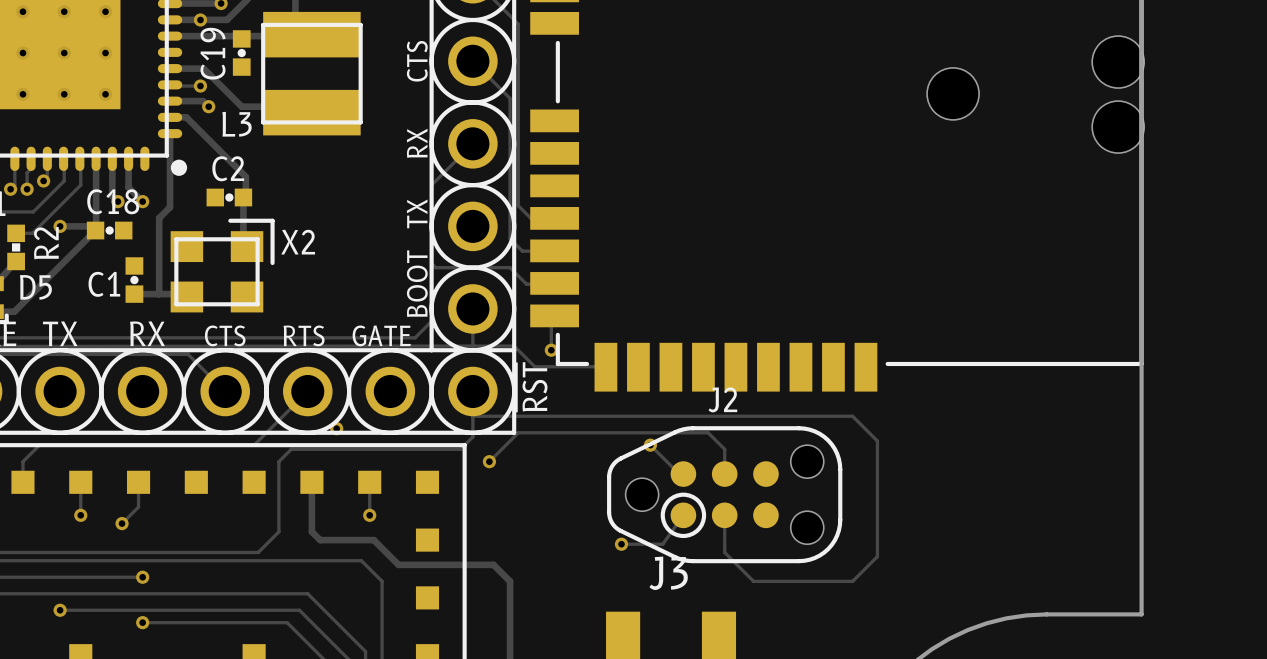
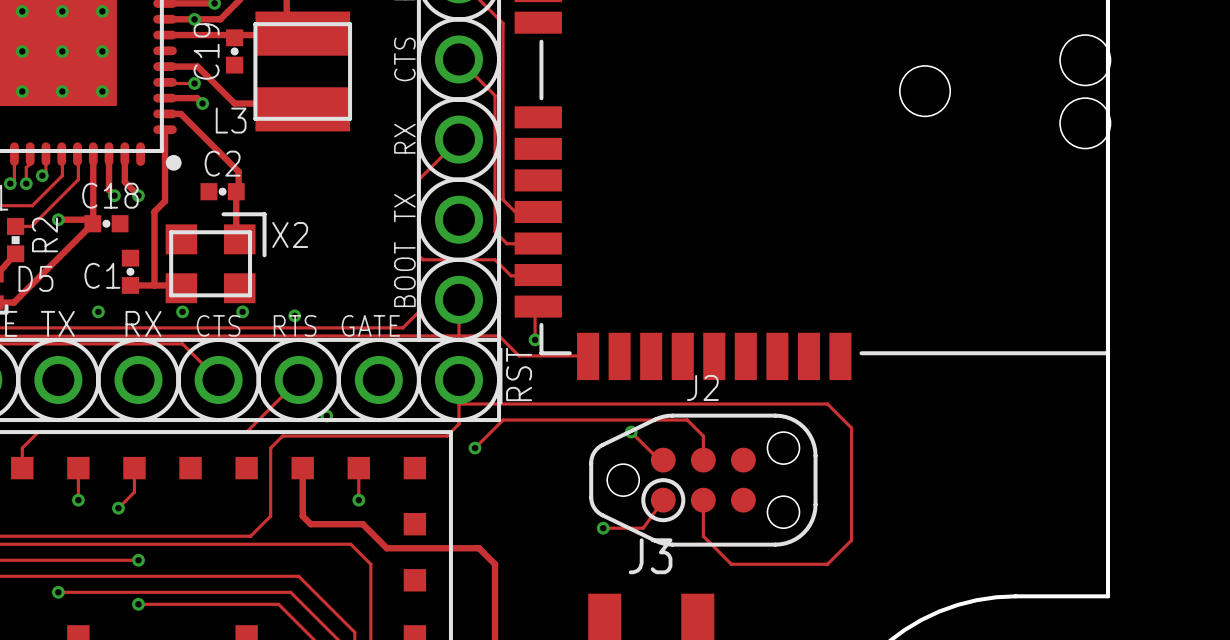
via: none -> (98, 311)
via: none -> (182, 311)
via: none -> (242, 311)
via: none -> (294, 315)

